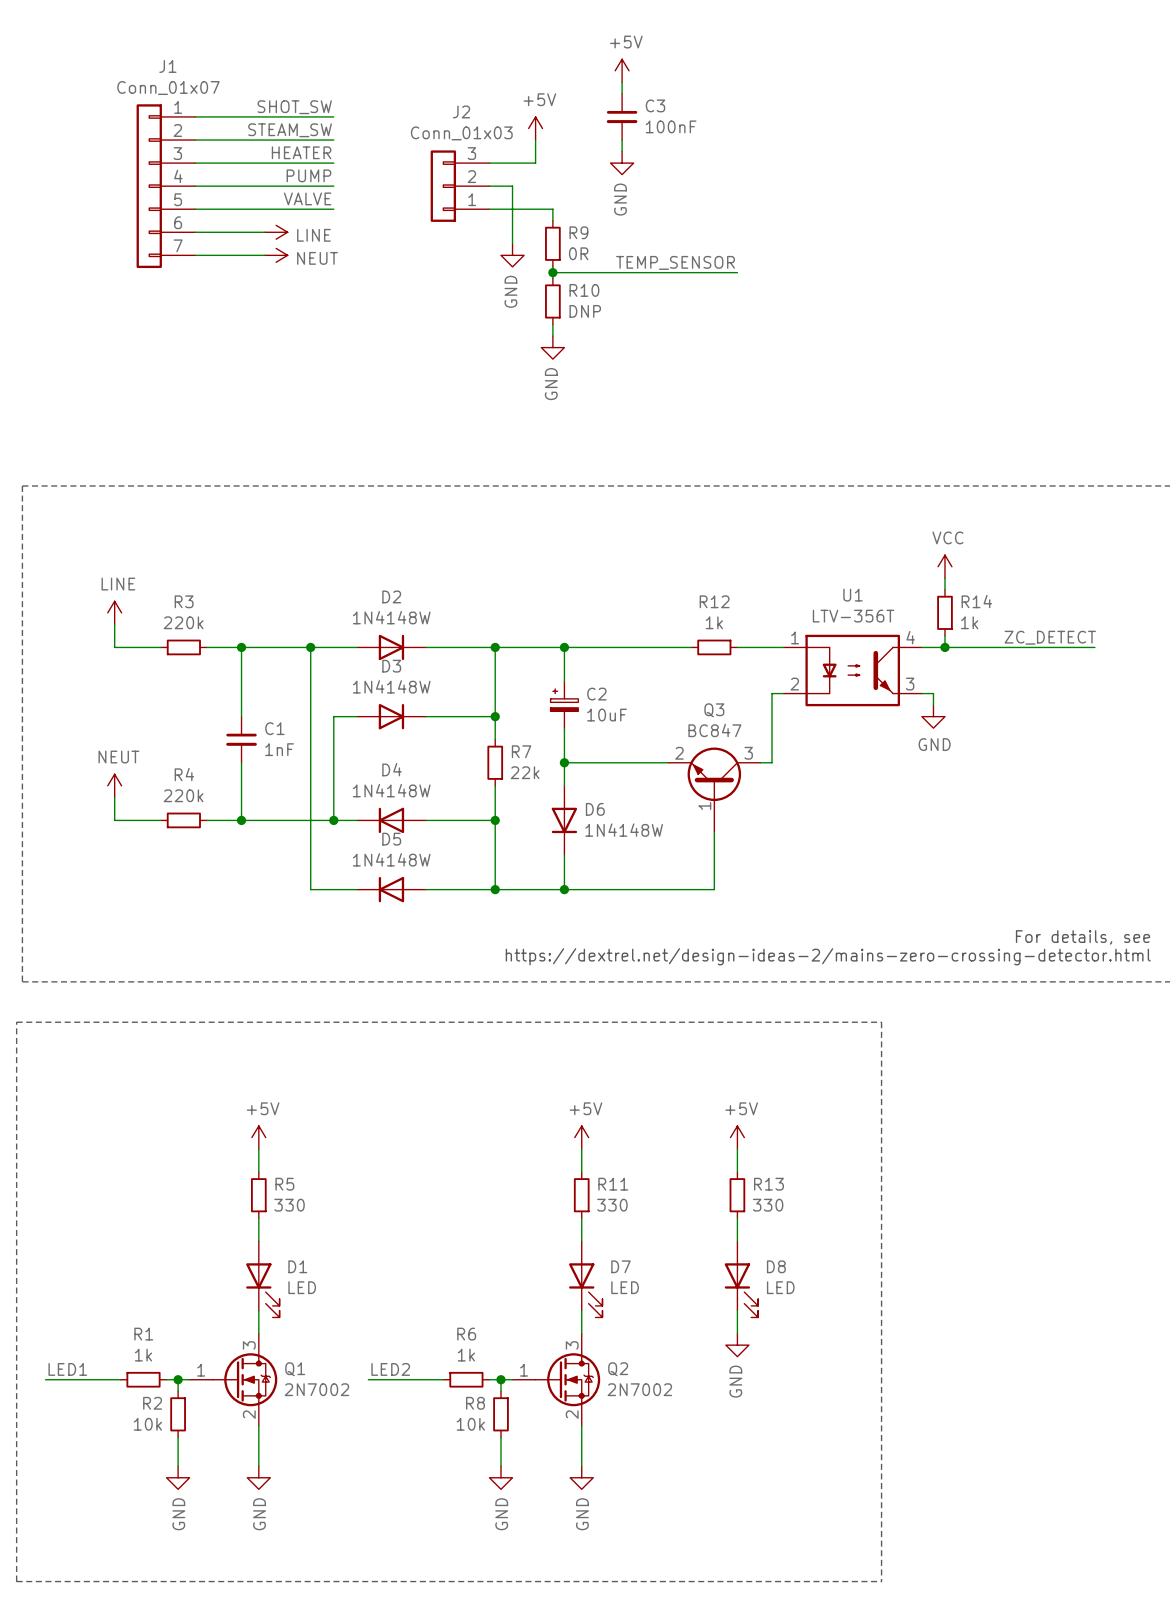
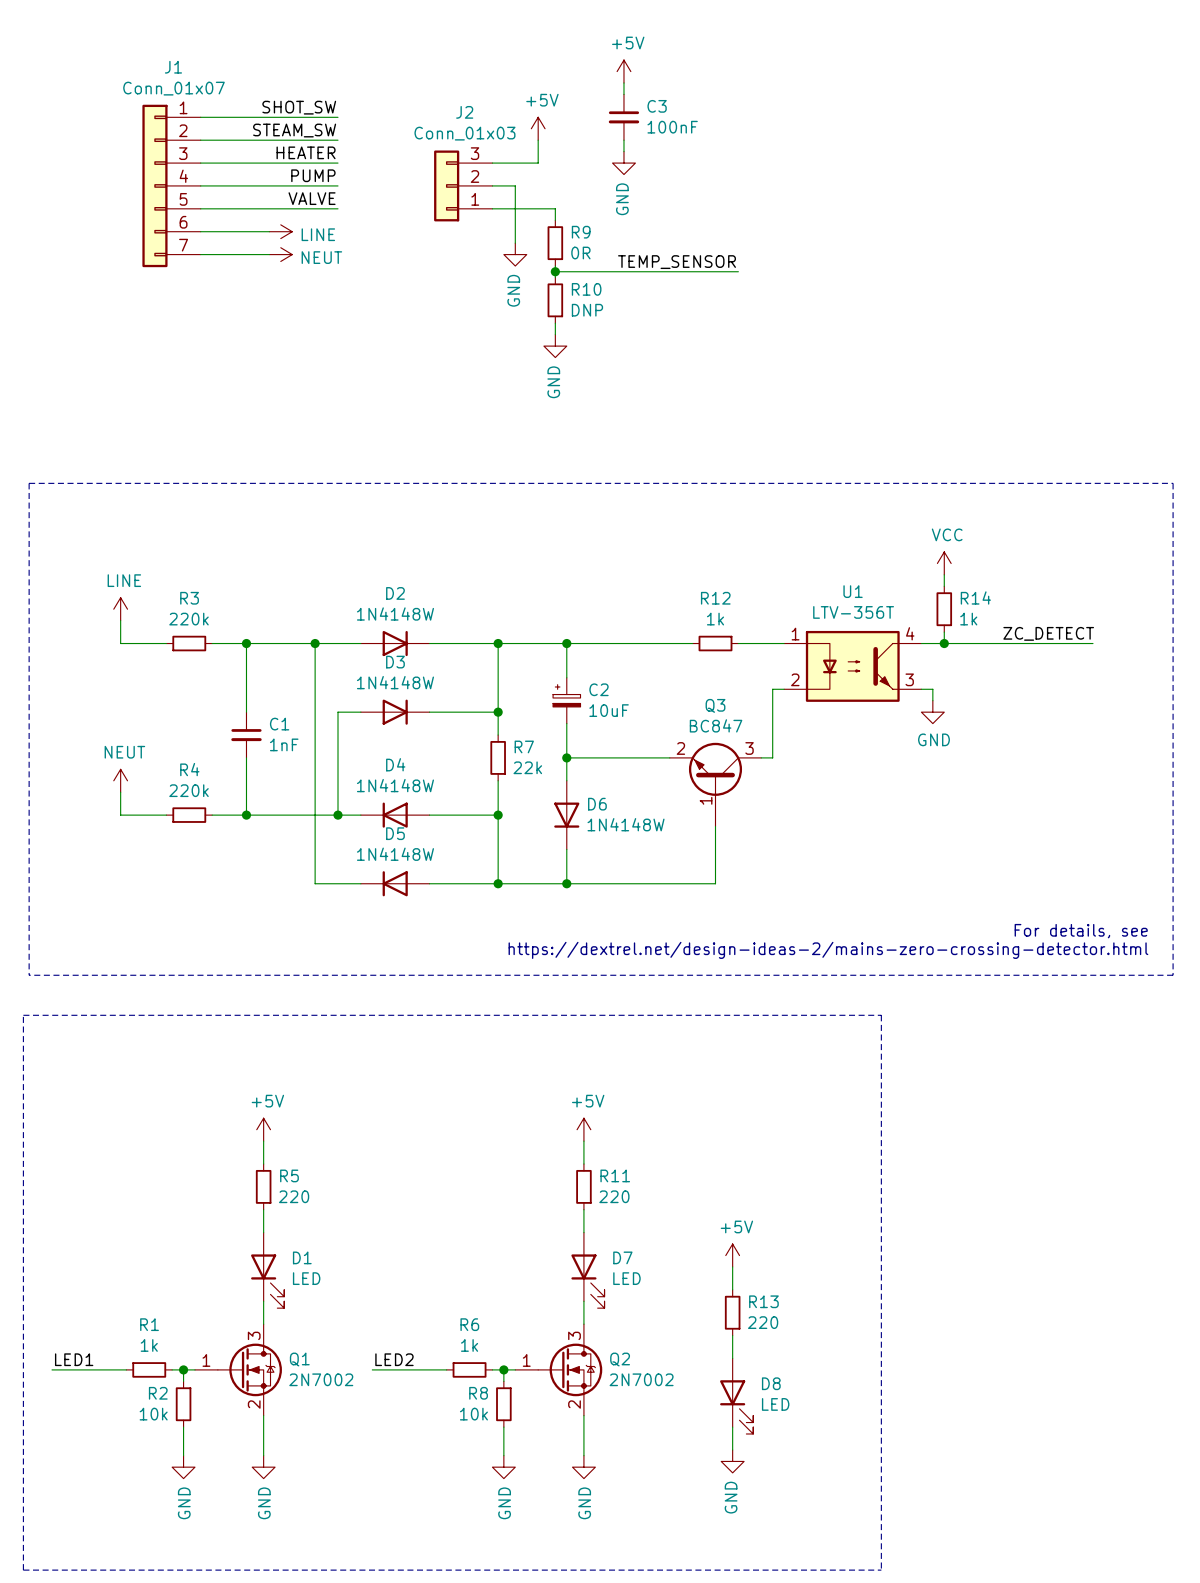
power symbol position: +5V (737, 1137) -> +5V (732, 1255)
wire: (737, 1149) (737, 1172) -> none
R13 position: (737, 1195) -> (732, 1312)
R5 value: 330 (289, 1205) -> 220 (294, 1196)
R11 value: 330 (612, 1205) -> 220 (614, 1196)
R13 value: 330 (768, 1205) -> 220 (763, 1322)
wire: (737, 1218) (737, 1241) -> (732, 1335) (732, 1358)
D8 position: (741, 1279) -> (736, 1396)
wire: (737, 1310) (737, 1333) -> (732, 1266) (732, 1289)
power symbol position: GND (737, 1345) -> GND (732, 1461)
wire: none -> (732, 1427) (732, 1450)

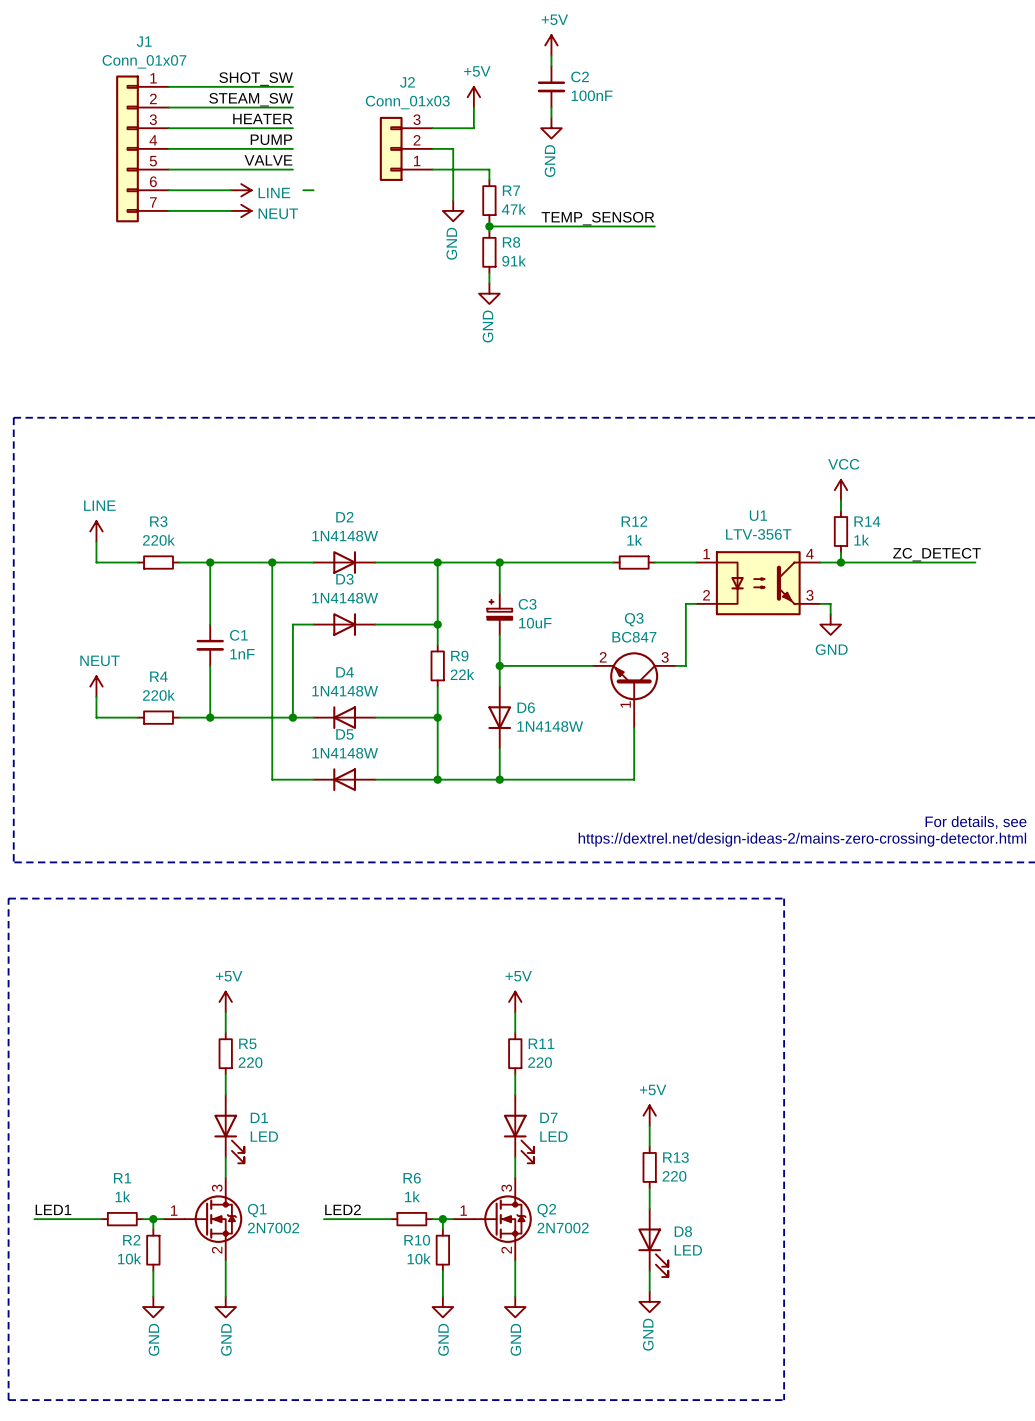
C3 name: C3 (657, 106) -> C2 (580, 76)
wire: none -> (303, 190) (313, 190)
R9 name: R9 (581, 232) -> R7 (511, 190)
R9 value: 0R (580, 253) -> 47k (513, 209)
R10 name: R10 (586, 289) -> R8 (511, 242)
R10 value: DNP (587, 310) -> 91k (514, 261)
C2 name: C2 (598, 689) -> C3 (527, 604)
R7 name: R7 (524, 746) -> R9 (459, 656)
R8 name: R8 (478, 1393) -> R10 (417, 1240)

